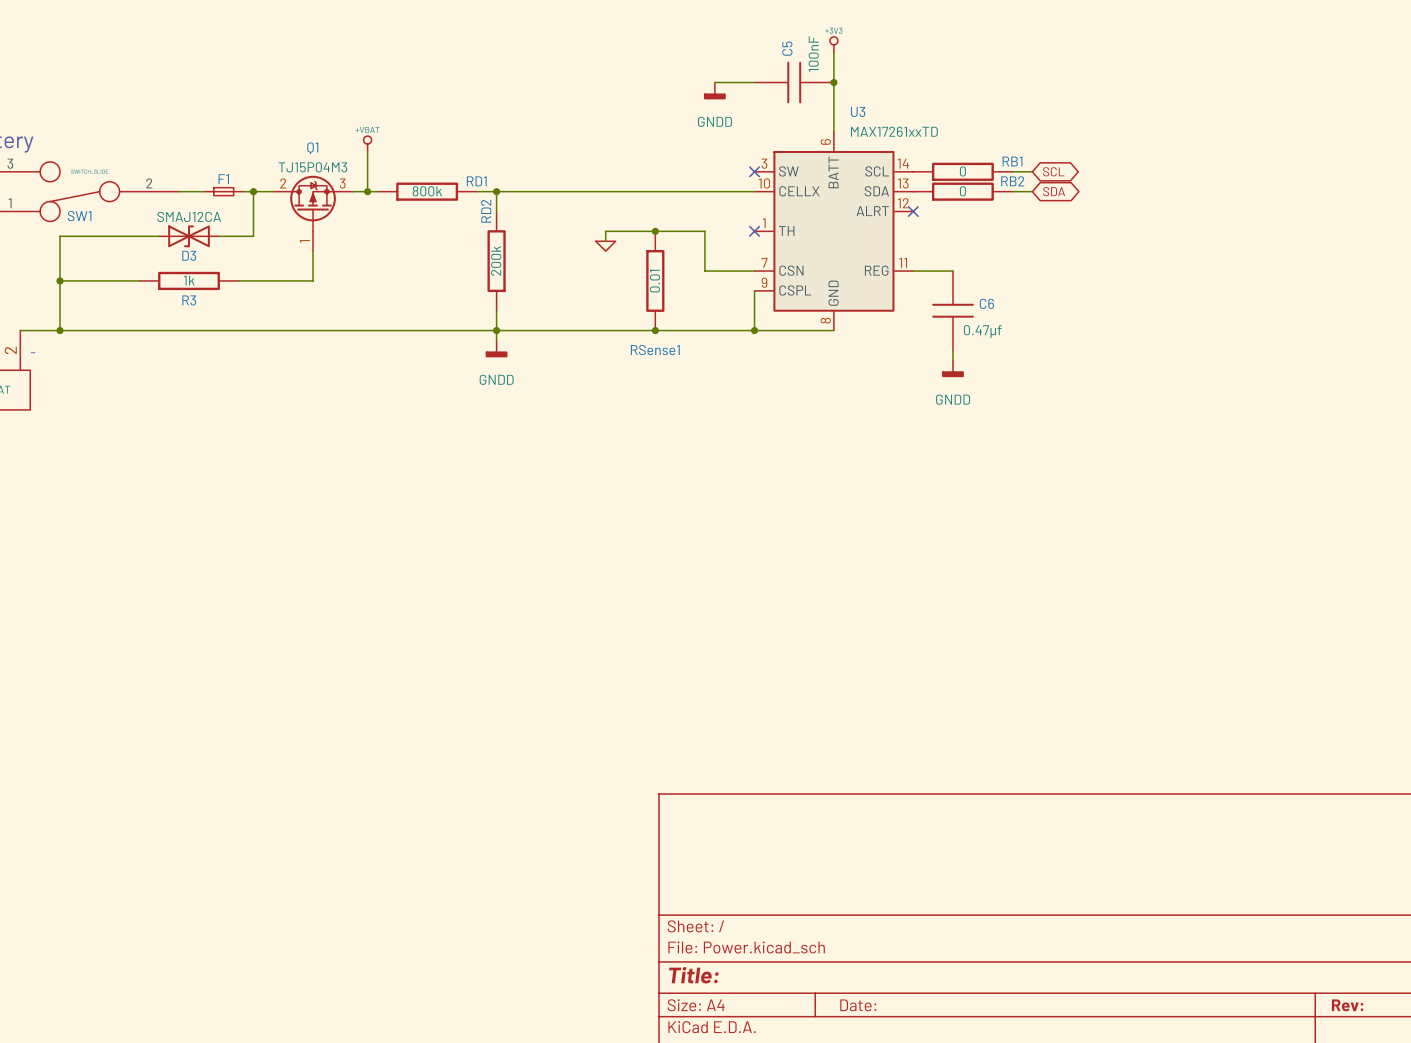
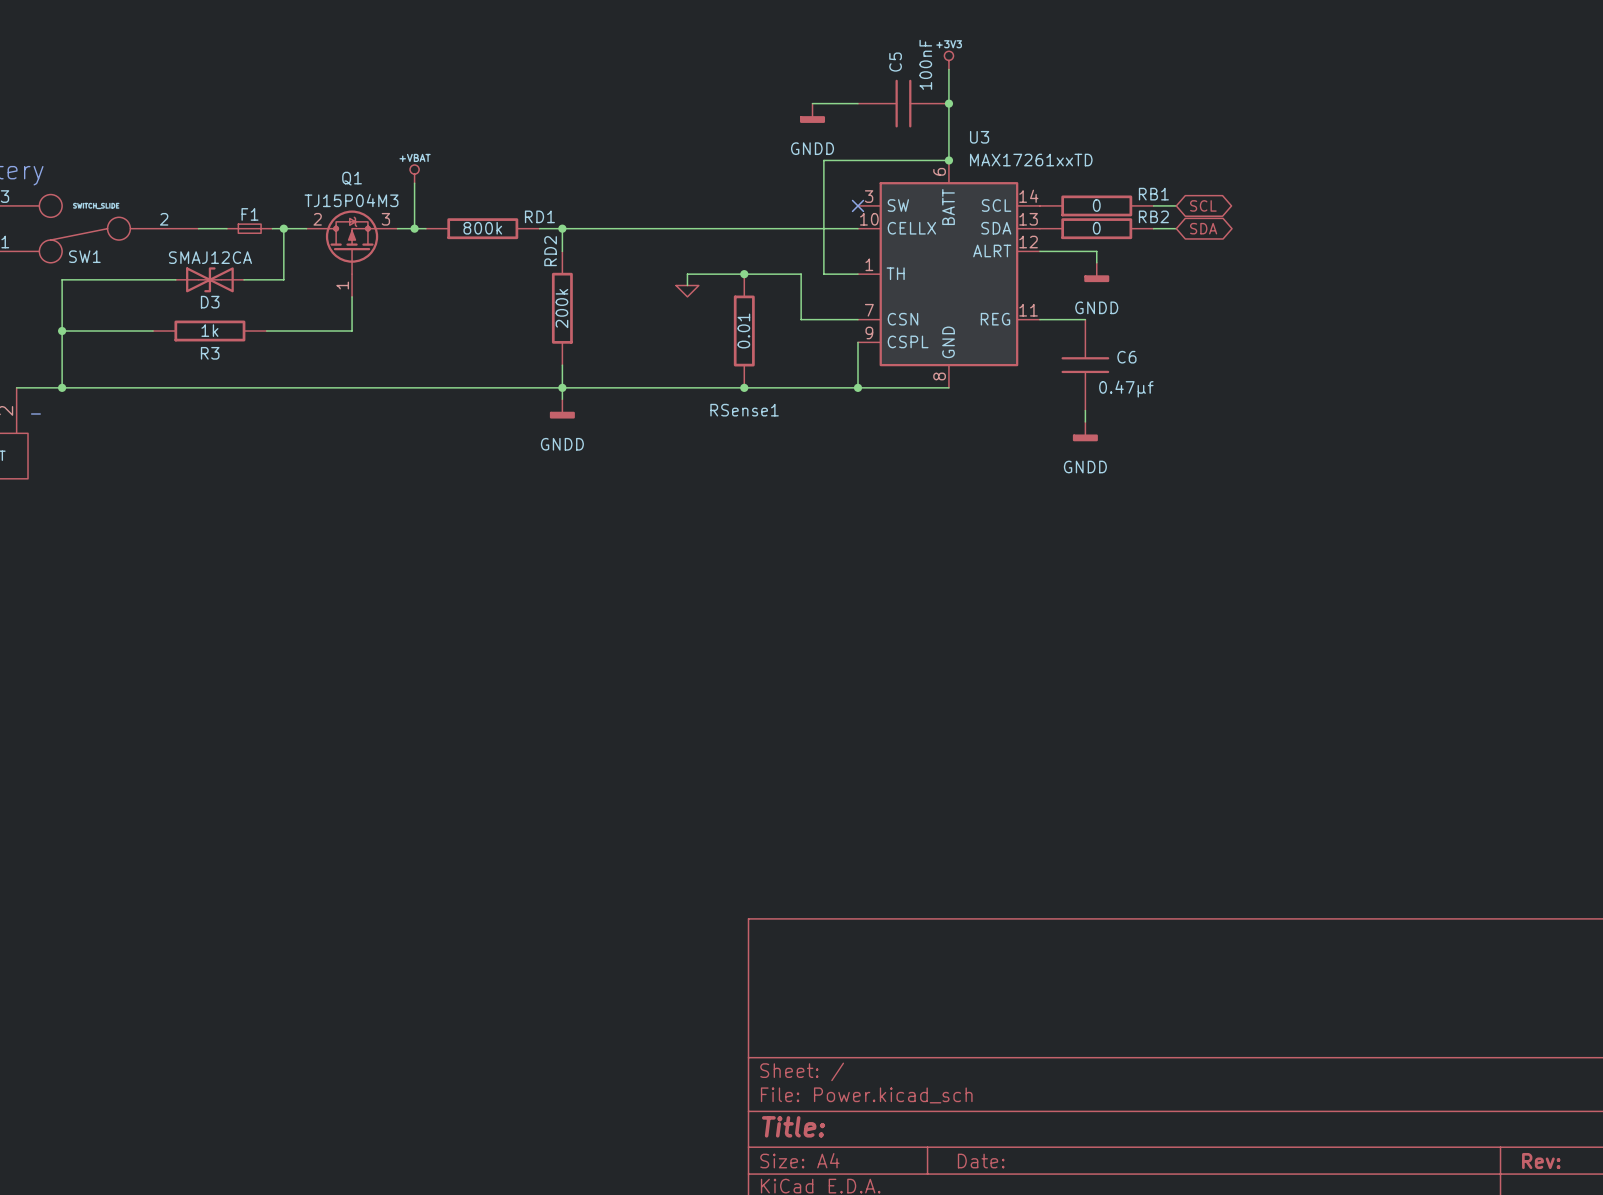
wire: none -> (948, 160) (823, 160) (823, 274) (857, 274)
junction: none -> (948, 160)
wire: none -> (1039, 251) (1096, 251) (1096, 262)
no-connect mark: (913, 211) -> none
power symbol: none -> GNDD (1096, 272)
no-connect mark: (754, 231) -> none

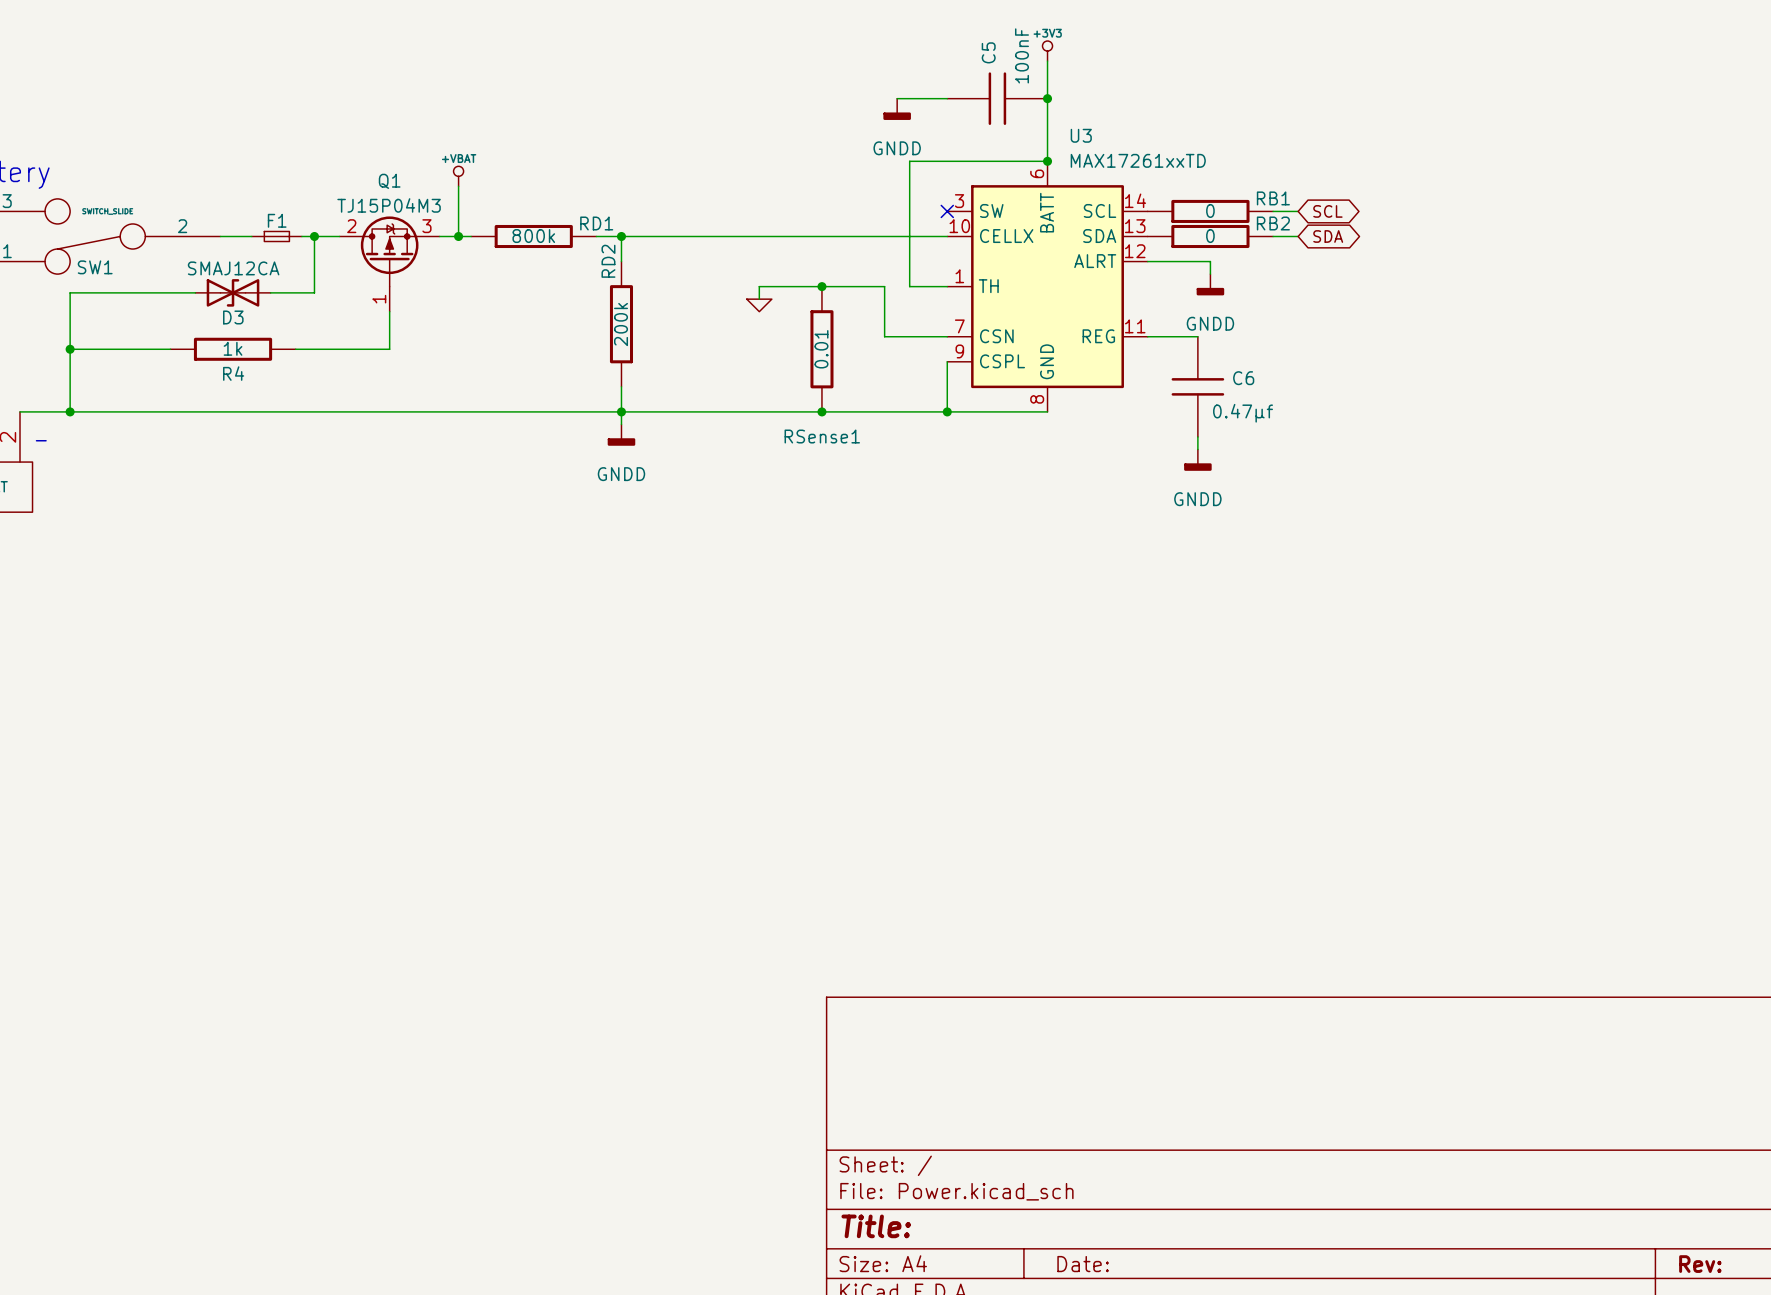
R3 name: R3 (210, 353) -> R4 (233, 373)

